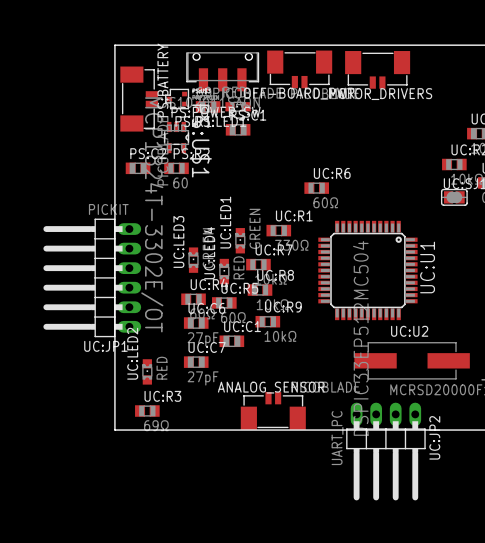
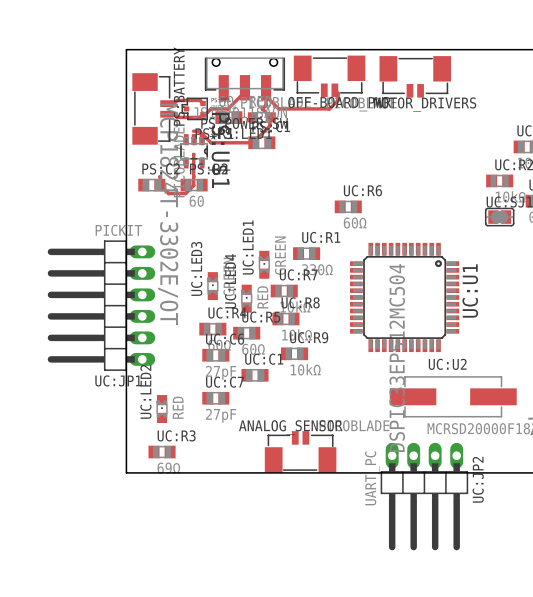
top track: none -> (244, 87) (244, 91) (227, 108) (211, 108) (200, 117) (177, 117) (174, 114) (167, 114)
top track: none -> (266, 87) (266, 105) (262, 108) (269, 116) (269, 125) (252, 142) (211, 142) (199, 131) (193, 131)
top track: none -> (334, 90) (338, 93) (338, 100) (329, 108) (278, 108) (266, 96)
top track: none -> (203, 103) (200, 100) (177, 100) (174, 103) (167, 103)
top track: none -> (193, 154) (193, 185) (185, 193) (168, 193) (160, 185) (159, 176)

